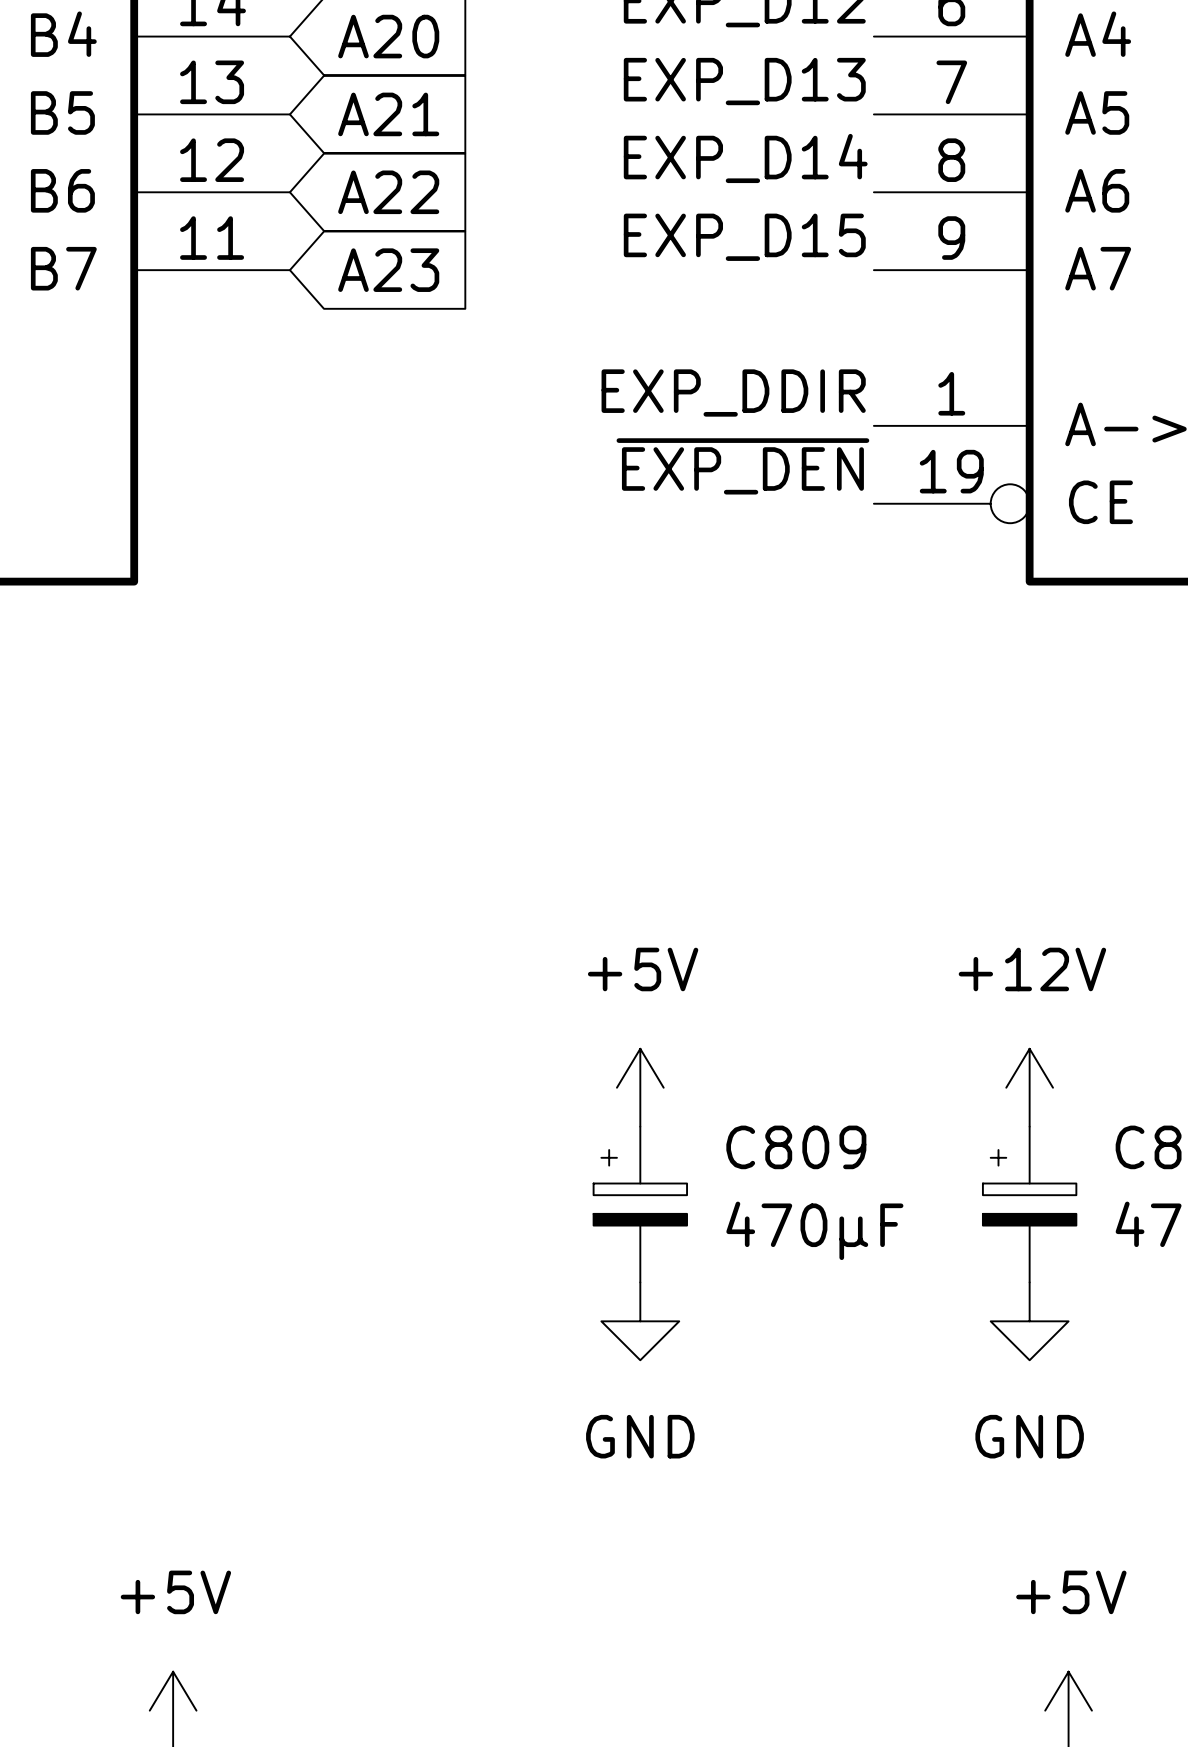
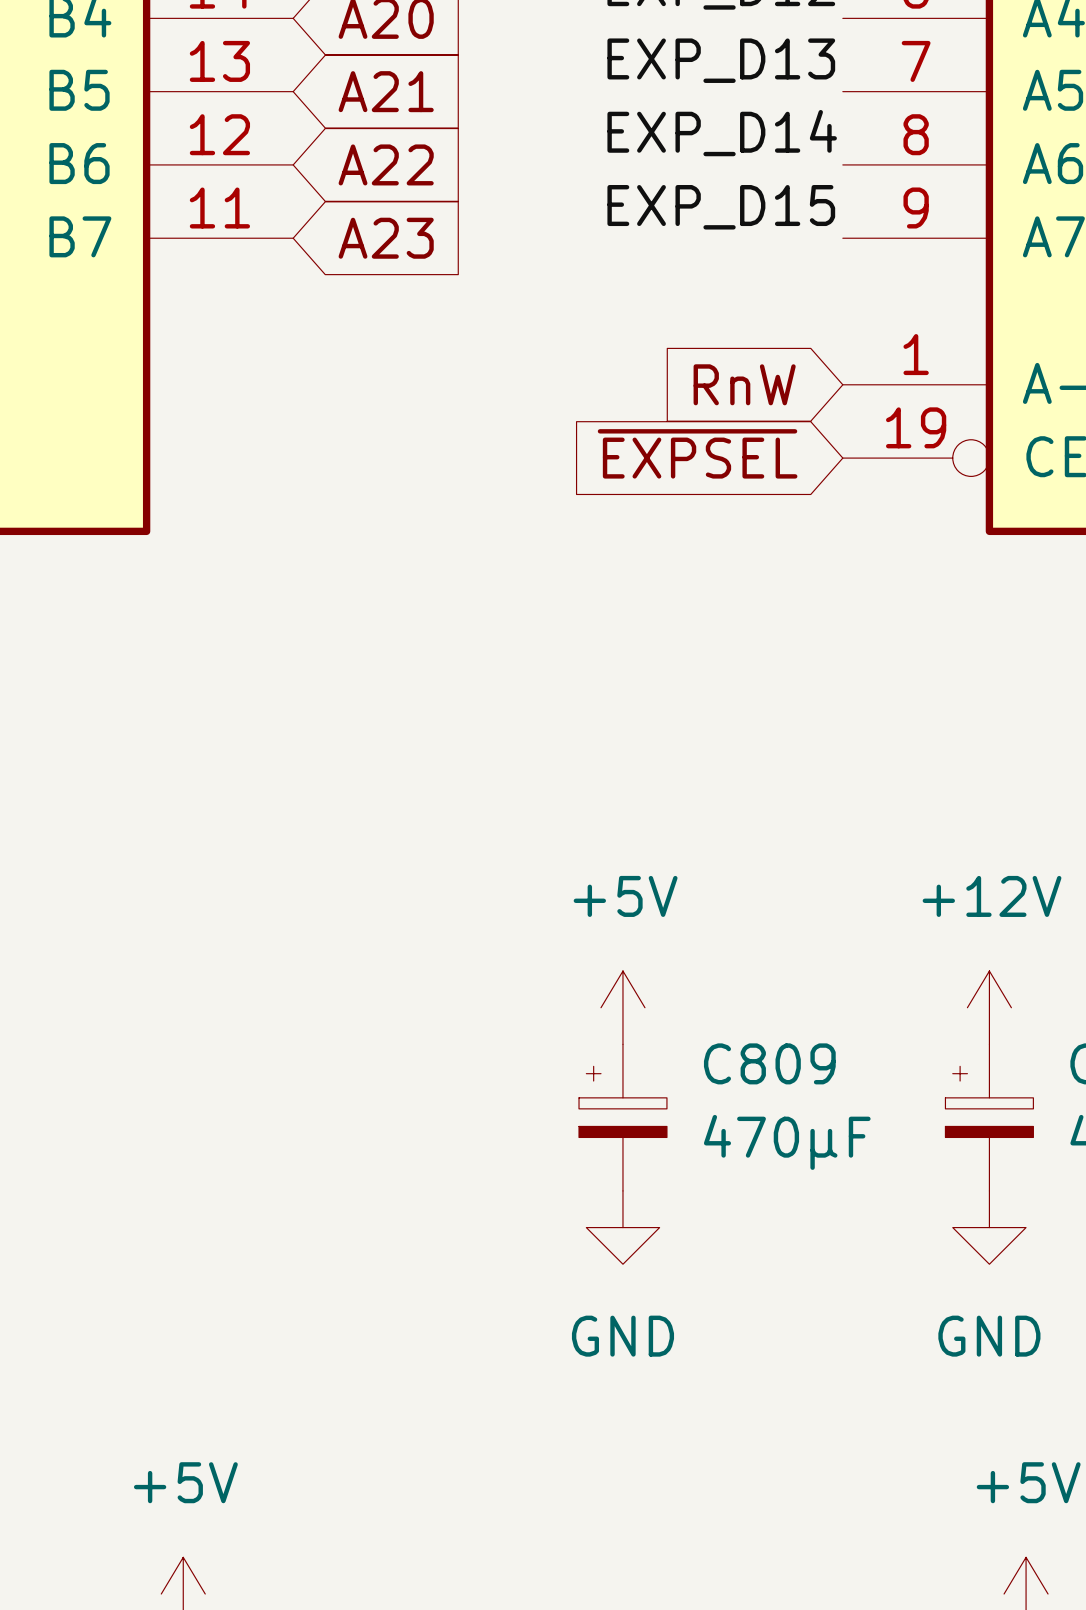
label: EXP_DDIR (733, 392) -> none
global label: none -> RnW (744, 384)
label: ~{EXP_DEN} (742, 466) -> none
global label: none -> ~{EXPSEL} (697, 453)

